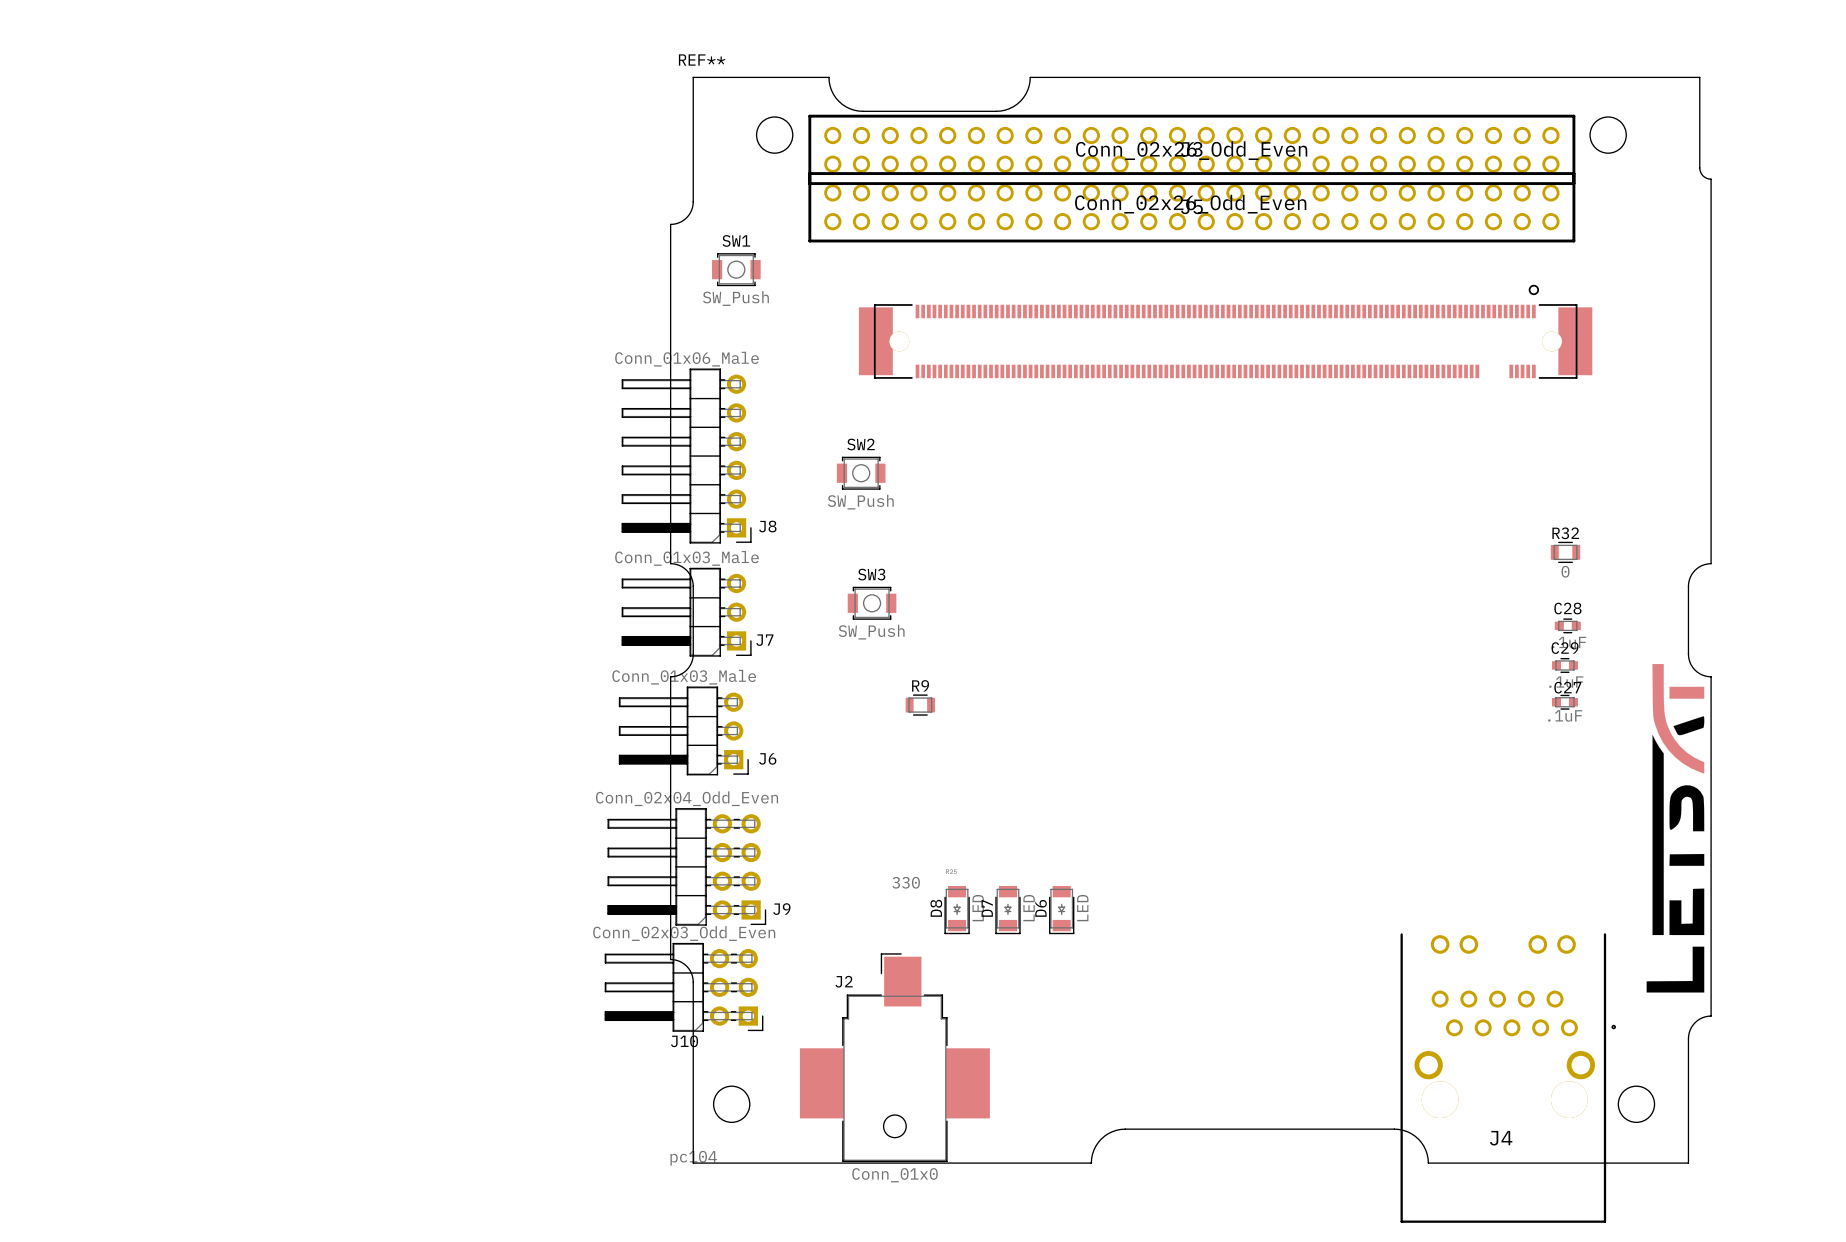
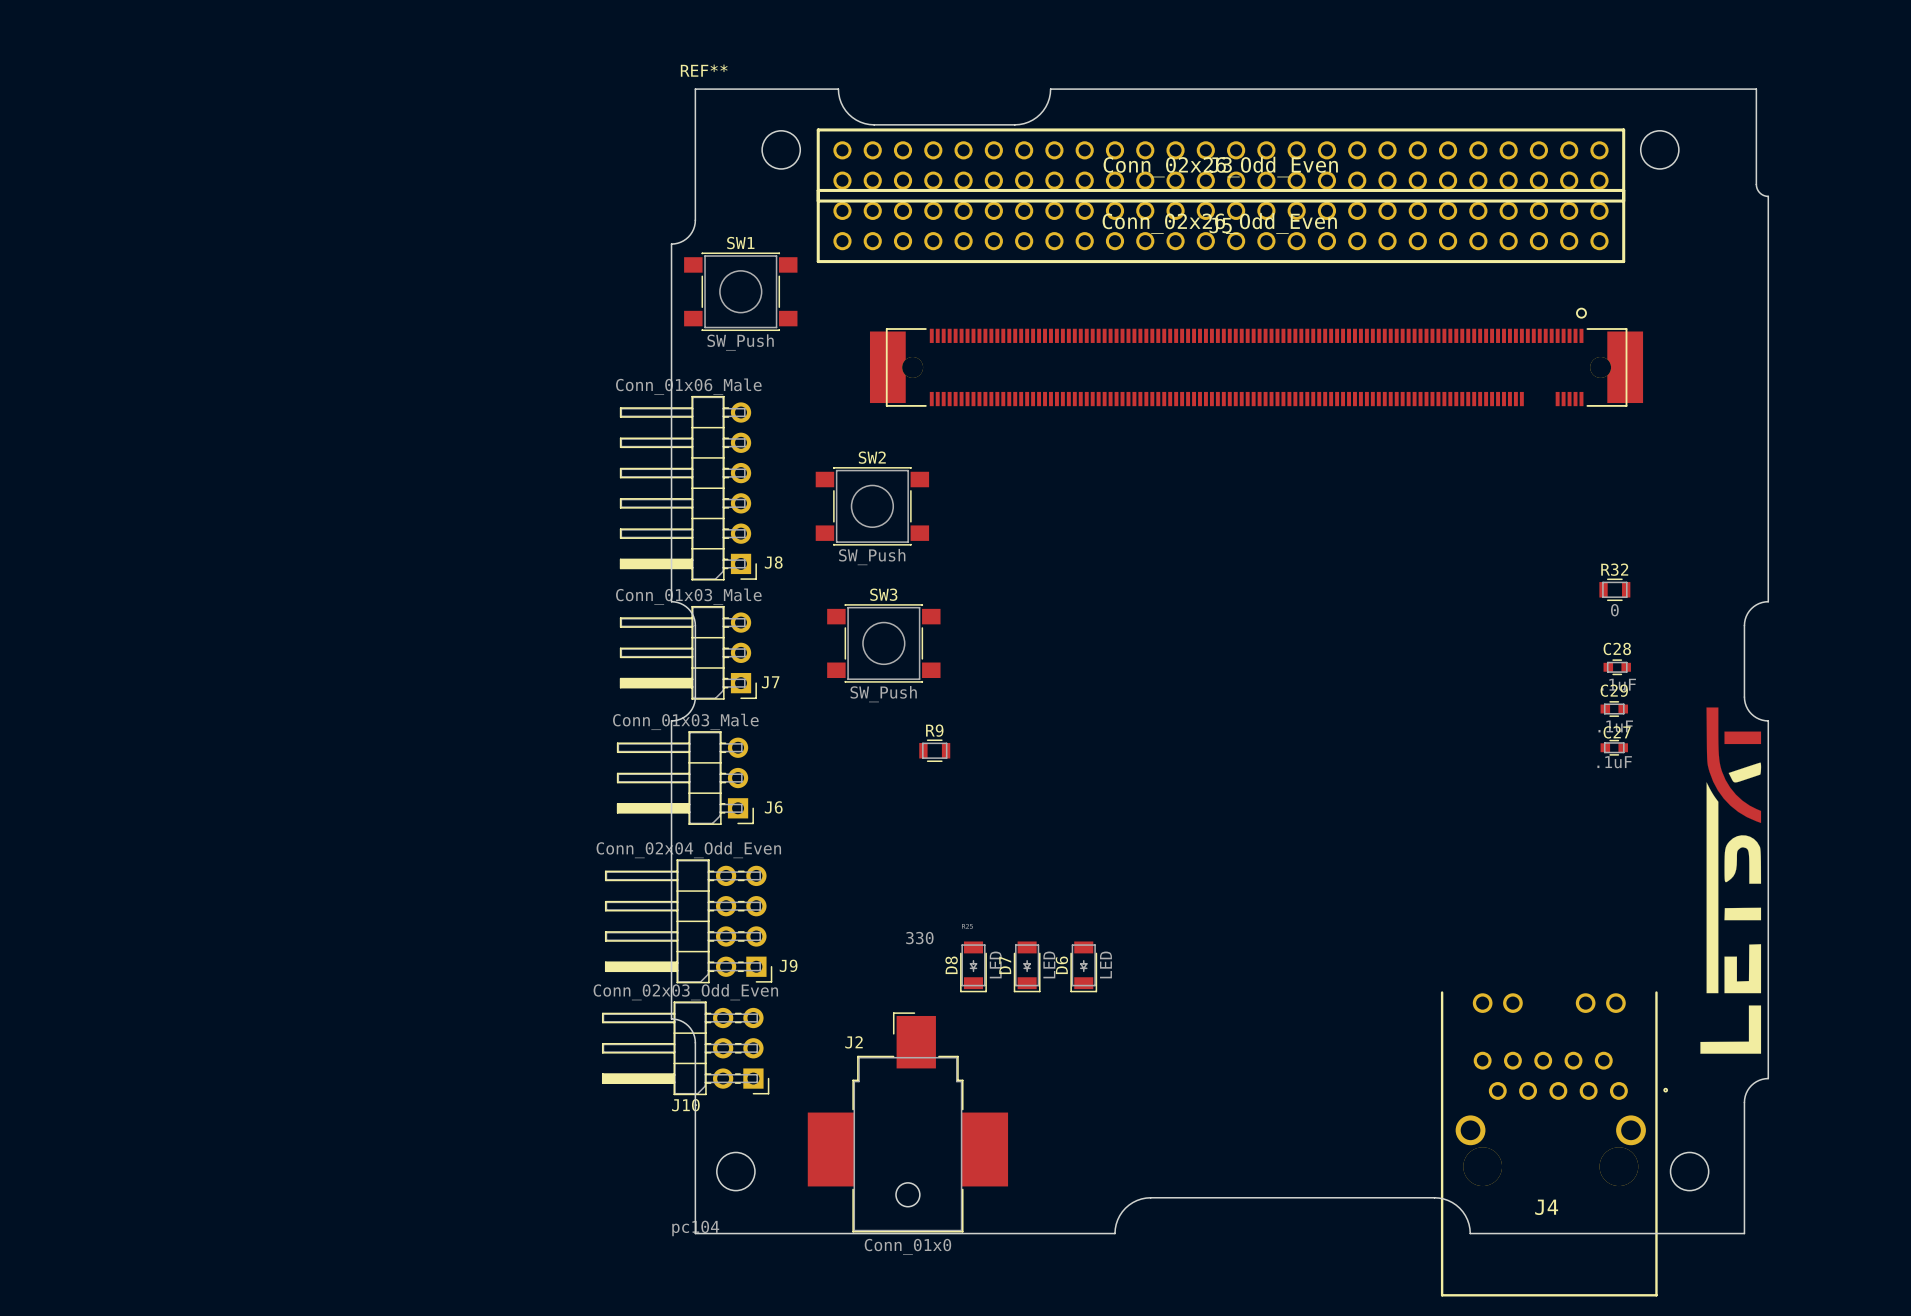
SW1 footprint: [712, 253, 761, 287] -> [684, 252, 798, 331]
SW2 footprint: [836, 456, 886, 490] -> [815, 467, 930, 546]
SW3 footprint: [847, 586, 897, 620] -> [827, 604, 941, 683]

